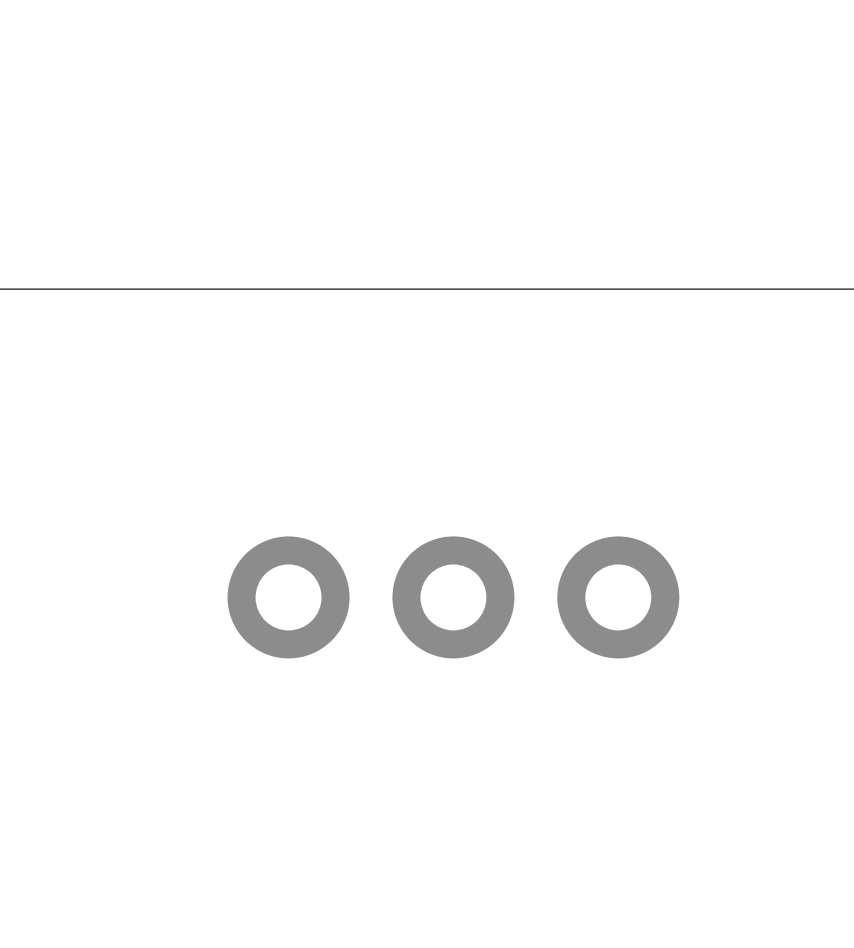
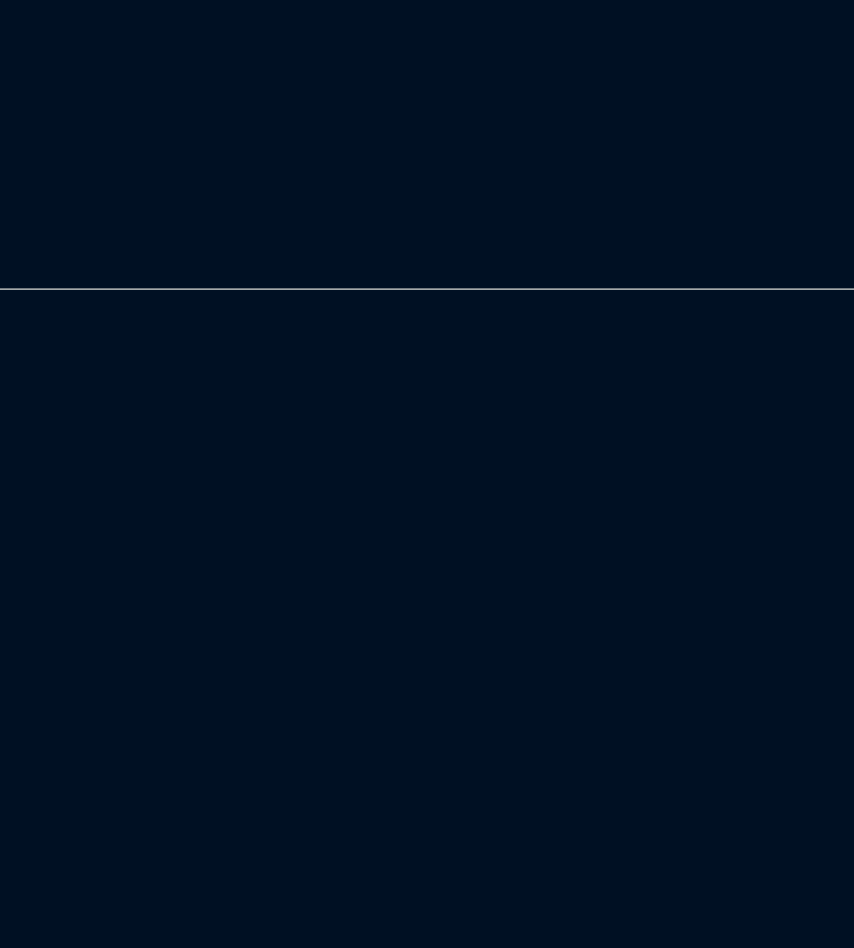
part: (453, 597) -> none

